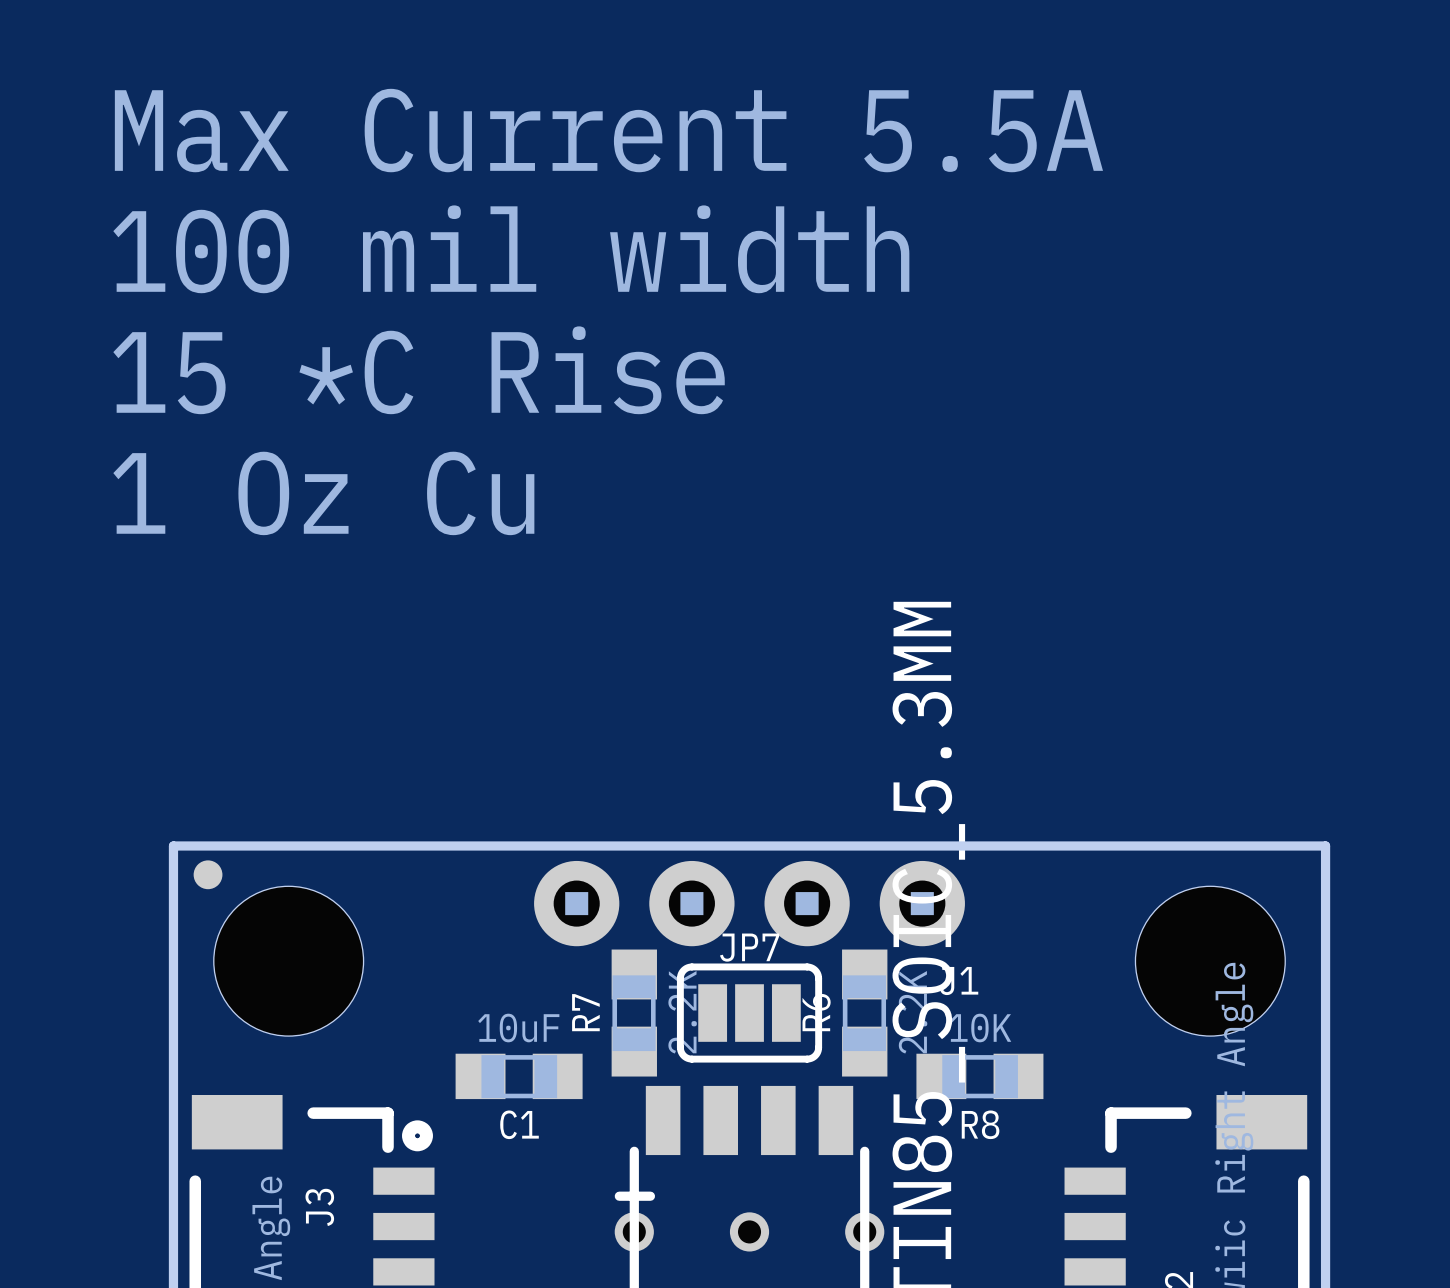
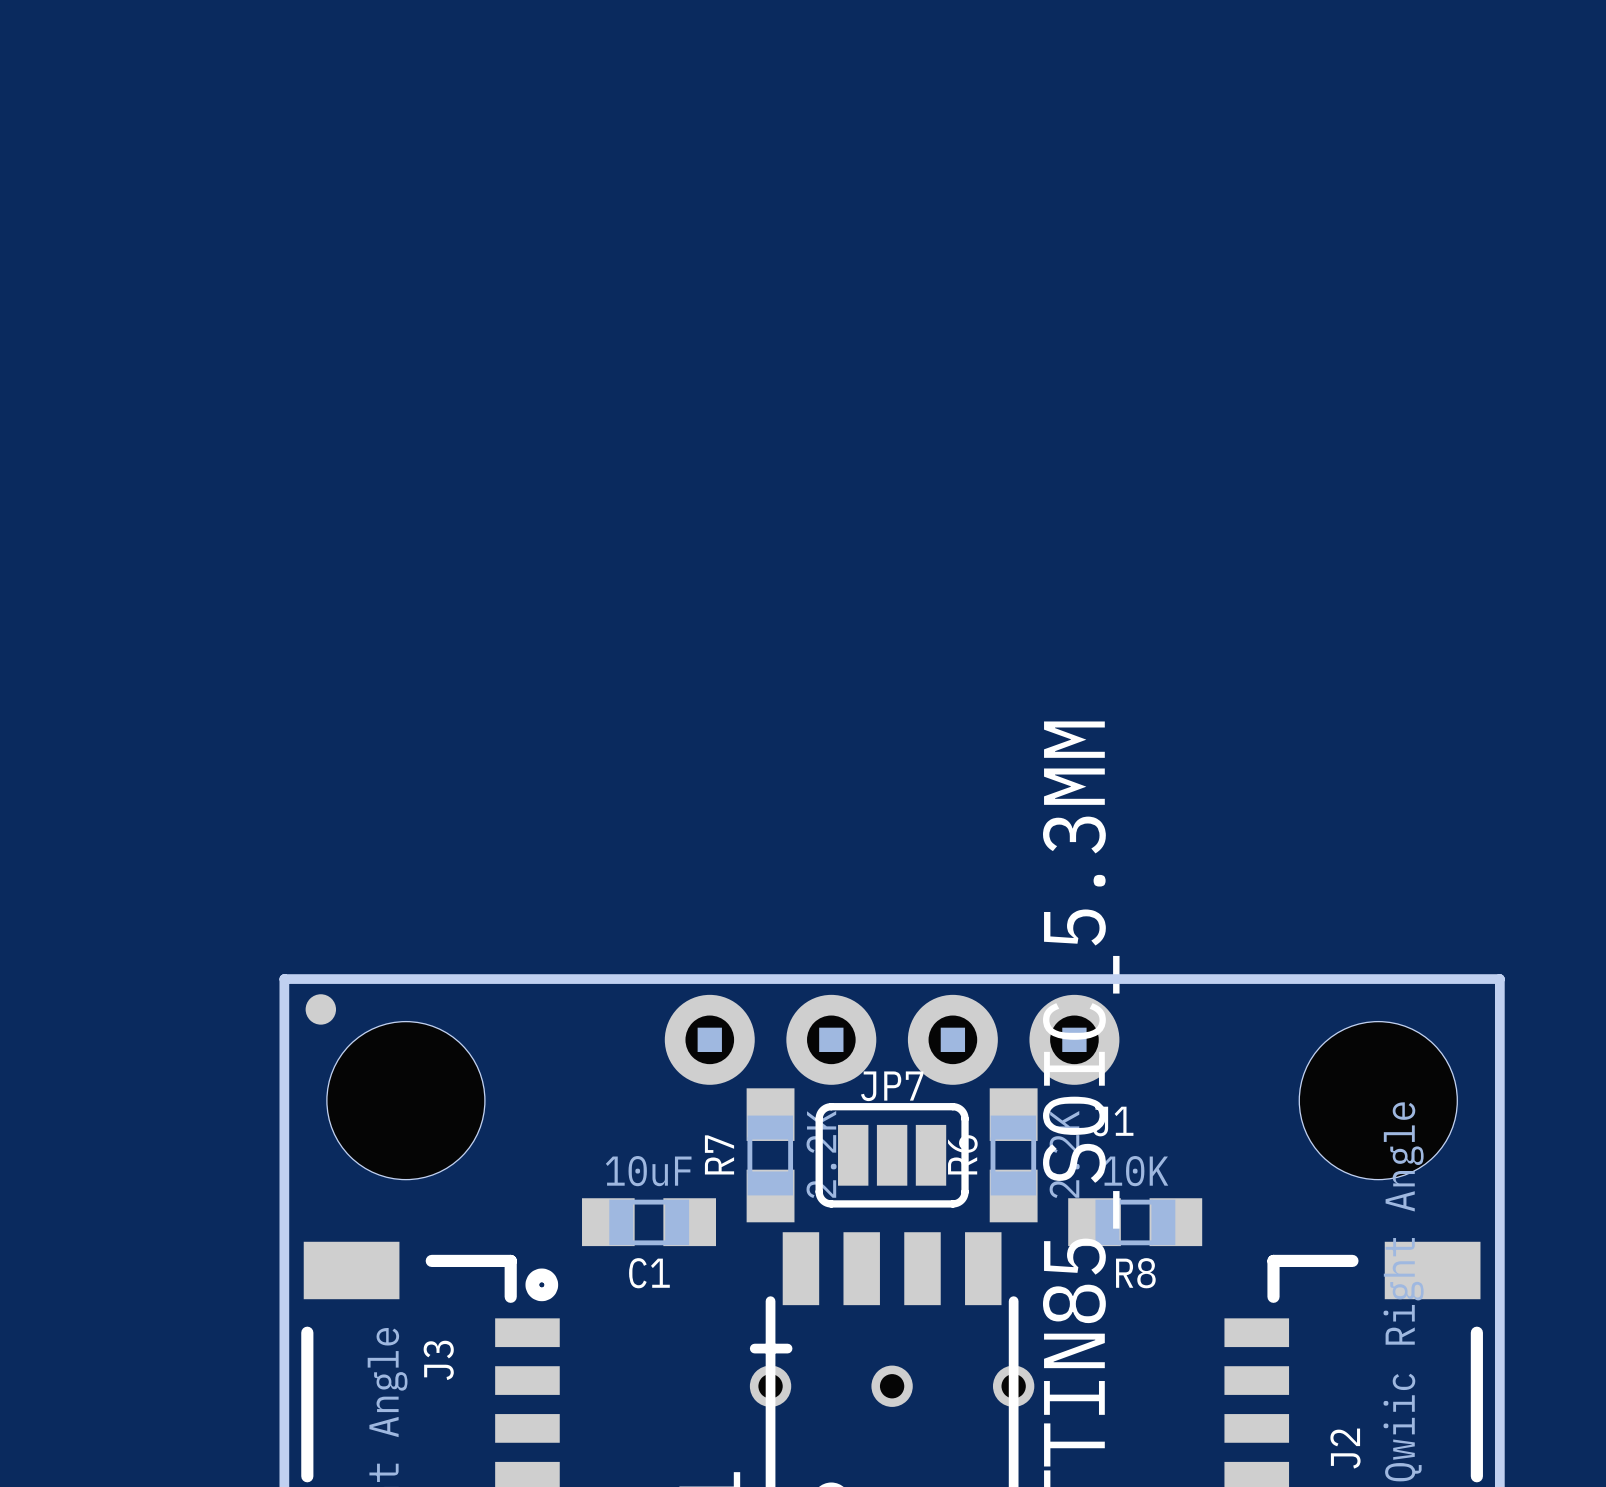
text: Max Current 5.5A (608, 130) -> none
text: 100 mil width (511, 249) -> none
text: 15 *C Rise (419, 370) -> none
text: 1 Oz Cu (323, 493) -> none

